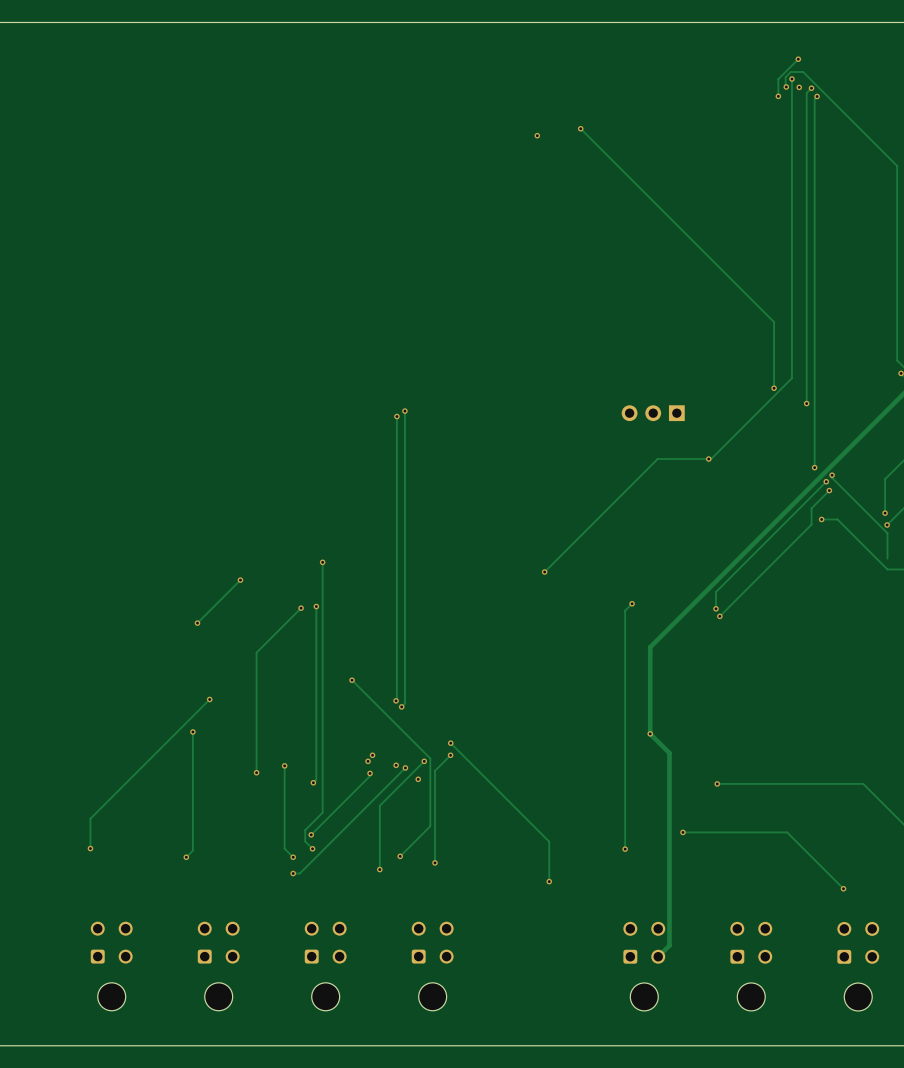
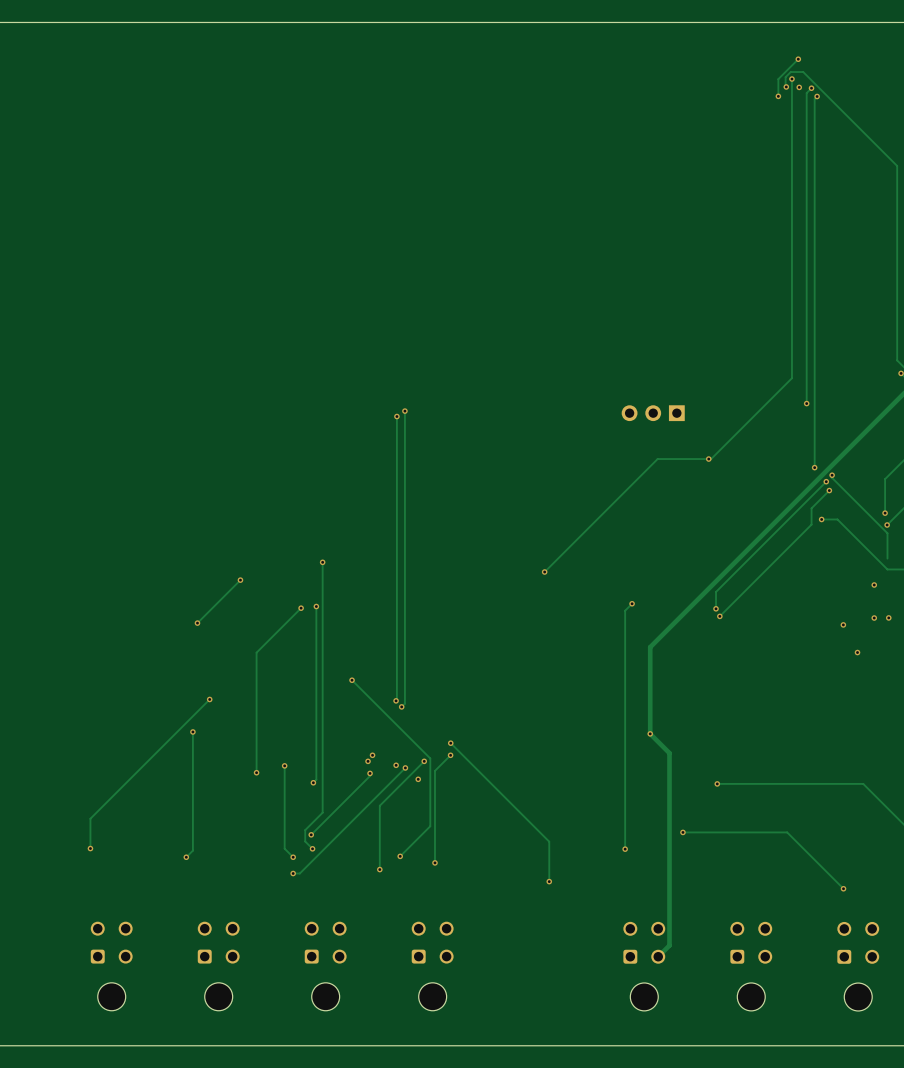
track: (580, 128) (774, 322) (774, 388) -> none
via: (580, 128) -> none
via: (537, 135) -> none
via: (774, 388) -> none
via: none -> (874, 585)
via: none -> (888, 617)
via: none -> (874, 618)
via: none -> (843, 624)
via: none -> (857, 652)

